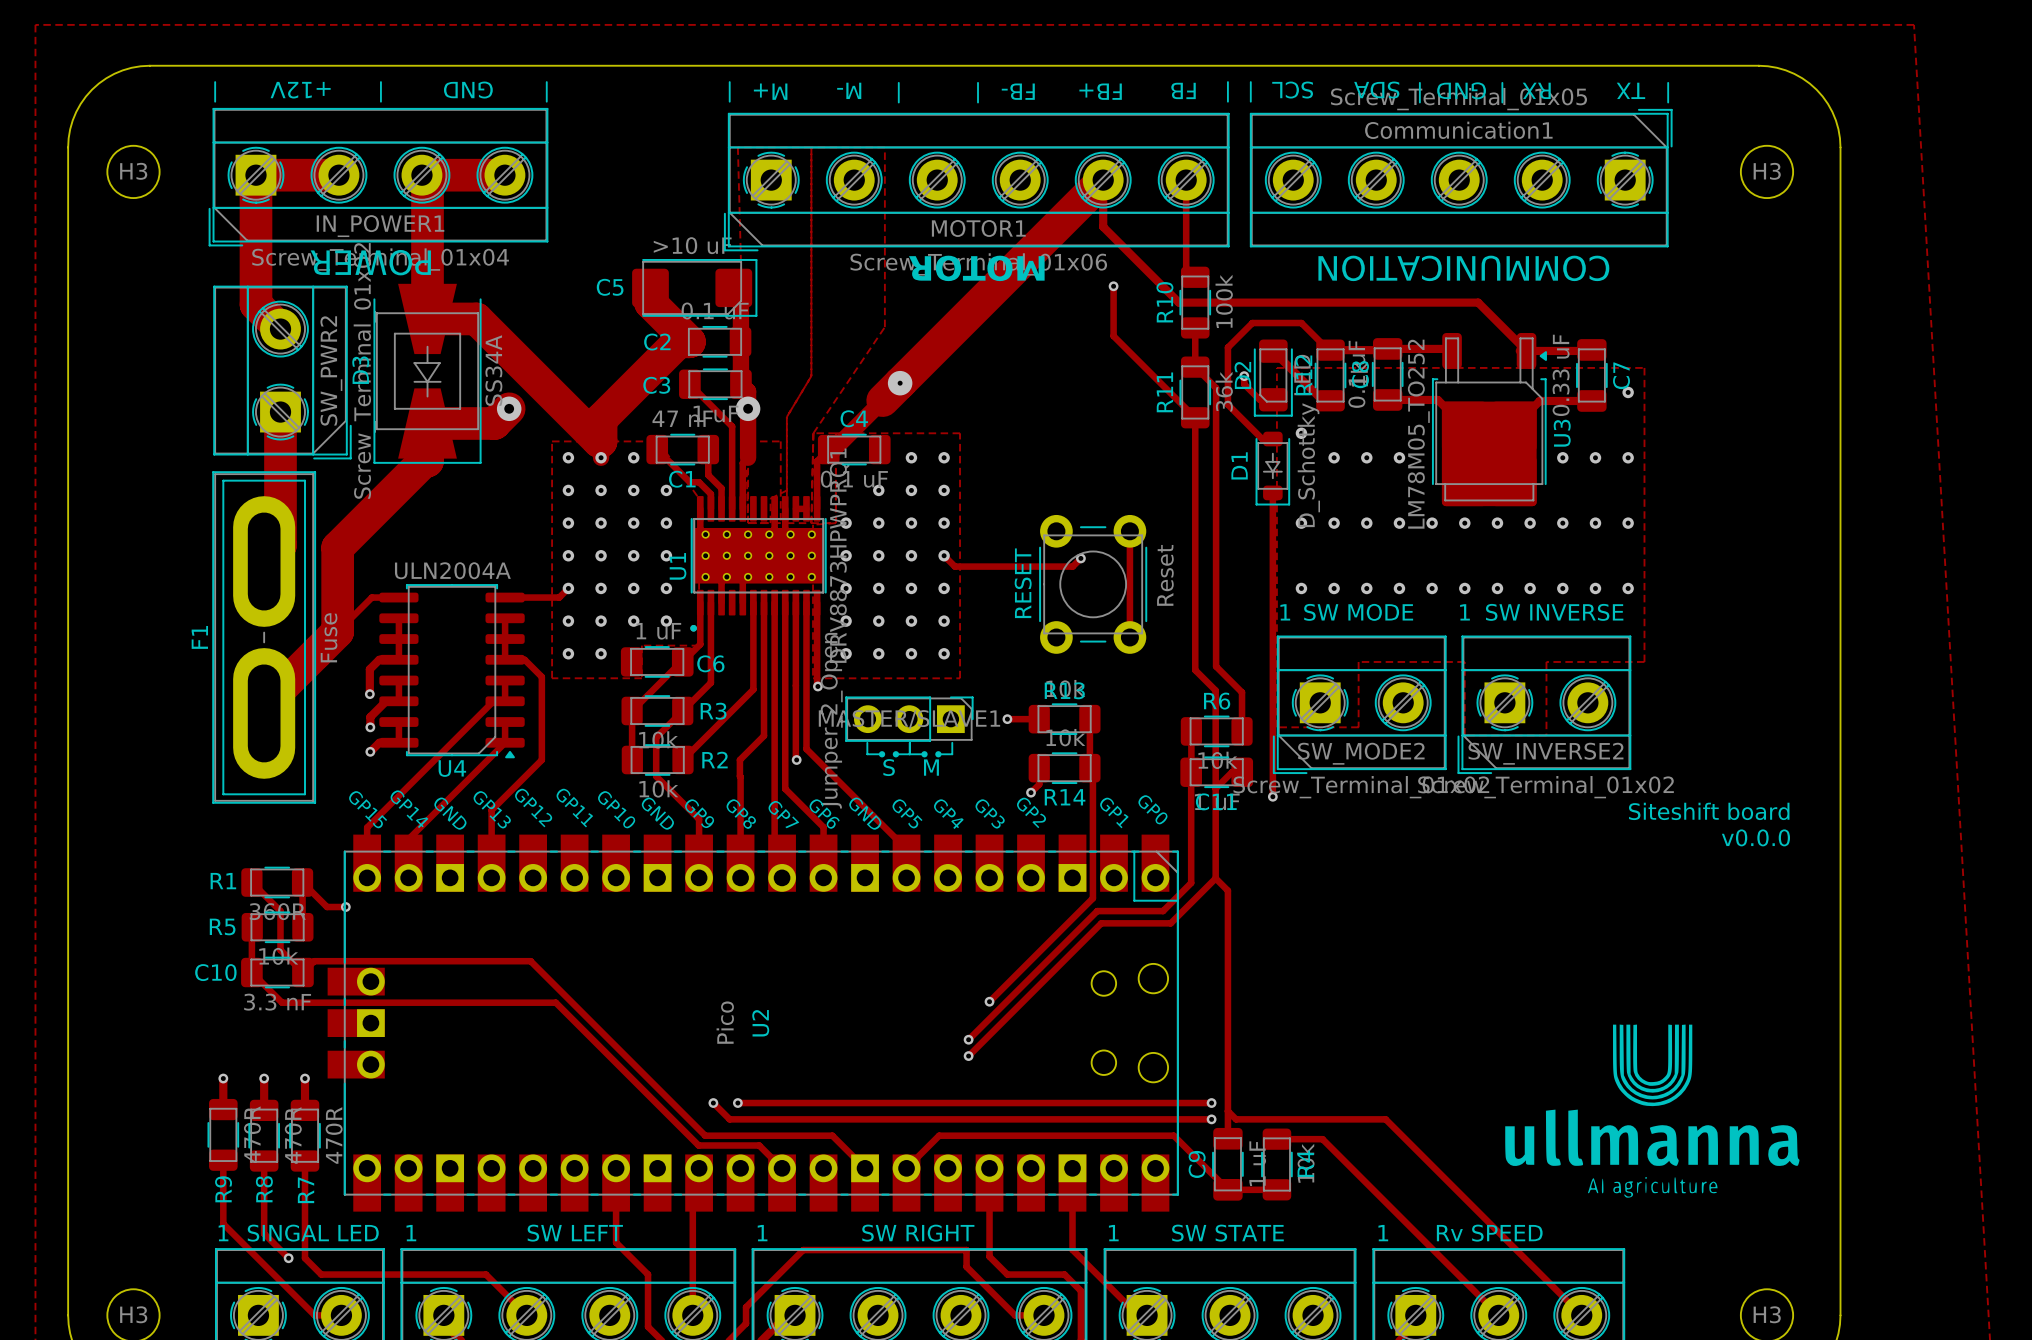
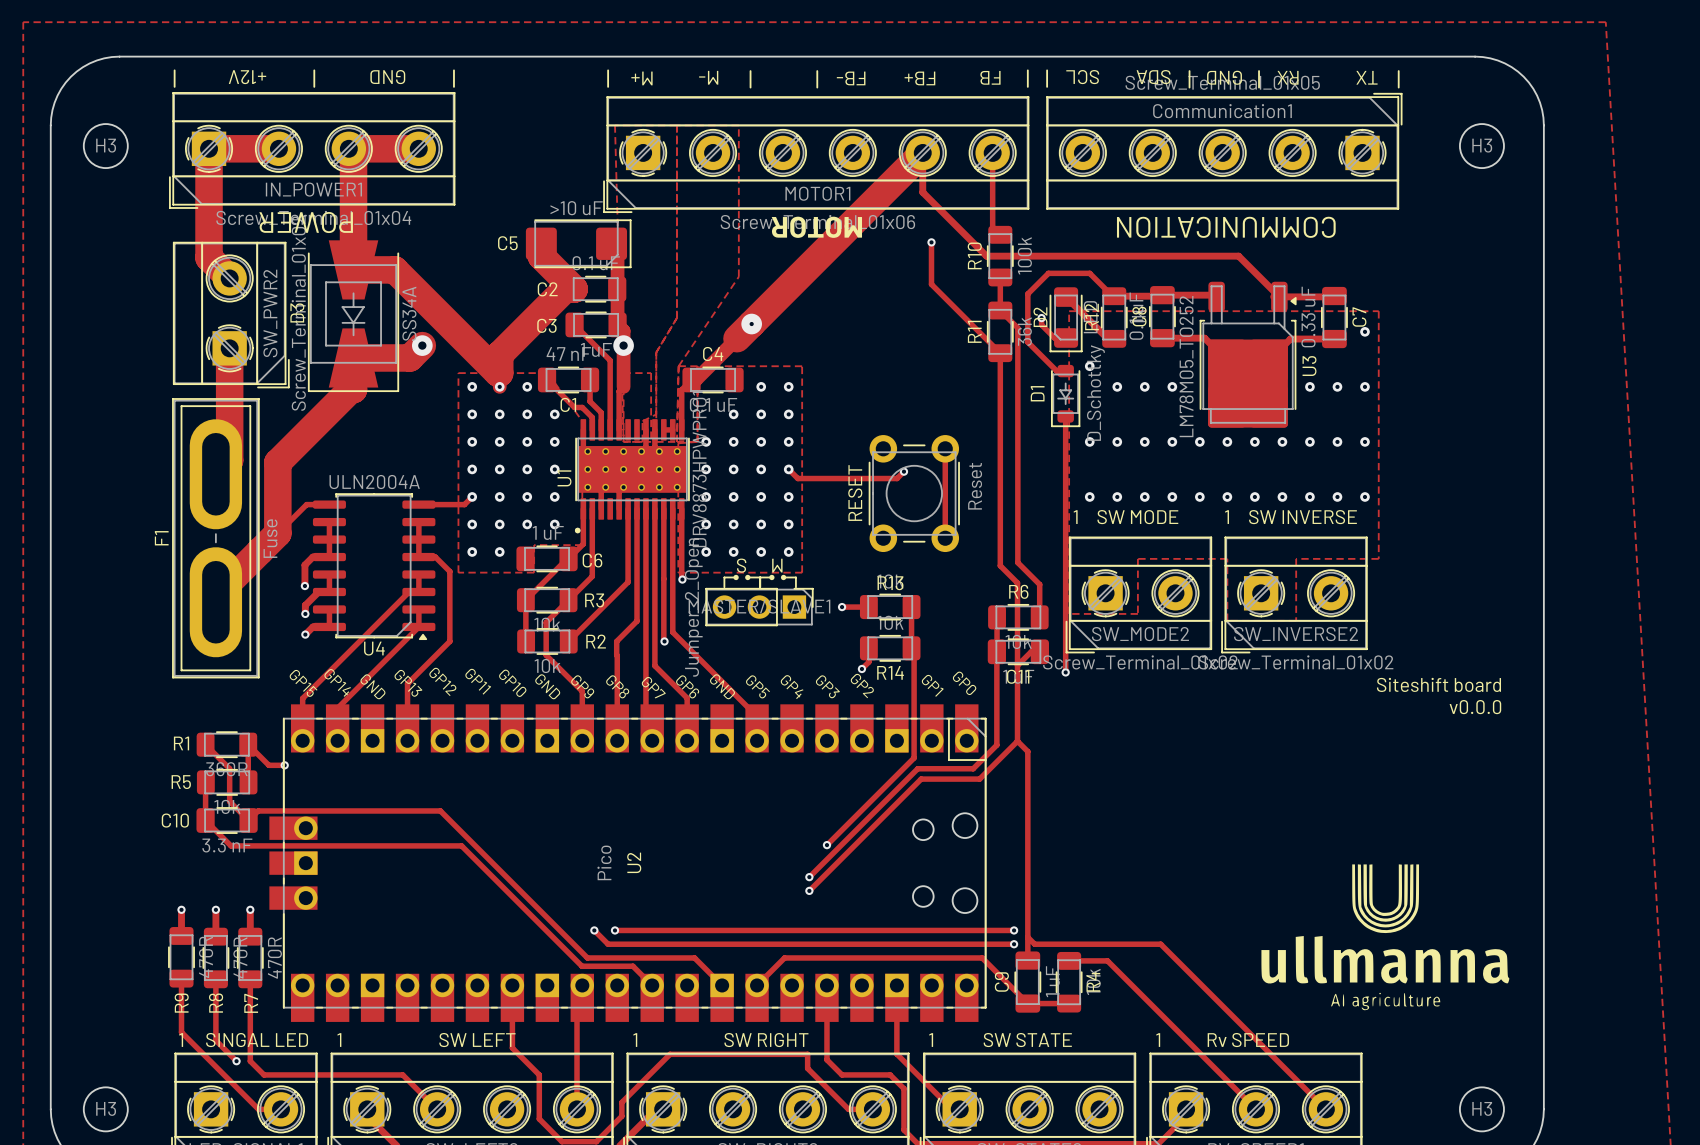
drawing: none -> [733, 574, 751, 581]
drawing: none -> [769, 574, 787, 581]
line: none -> (736, 577) (724, 577) (724, 587)
line: none -> (783, 577) (795, 577) (795, 587)
line: (867, 742) (867, 754) (882, 754) -> none
line: (909, 742) (909, 754) -> (760, 577) (760, 587)
line: (952, 742) (952, 754) (938, 754) -> none
drawing: [878, 751, 900, 758] -> none
drawing: [921, 751, 942, 758] -> none
line: (895, 754) (924, 754) -> (747, 577) (771, 577)
text rotation: 0° (889, 767) -> 180° (741, 565)
text position: S (889, 767) -> S (741, 565)
text rotation: 0° (931, 767) -> 180° (777, 565)
text position: M (931, 767) -> M (777, 565)

